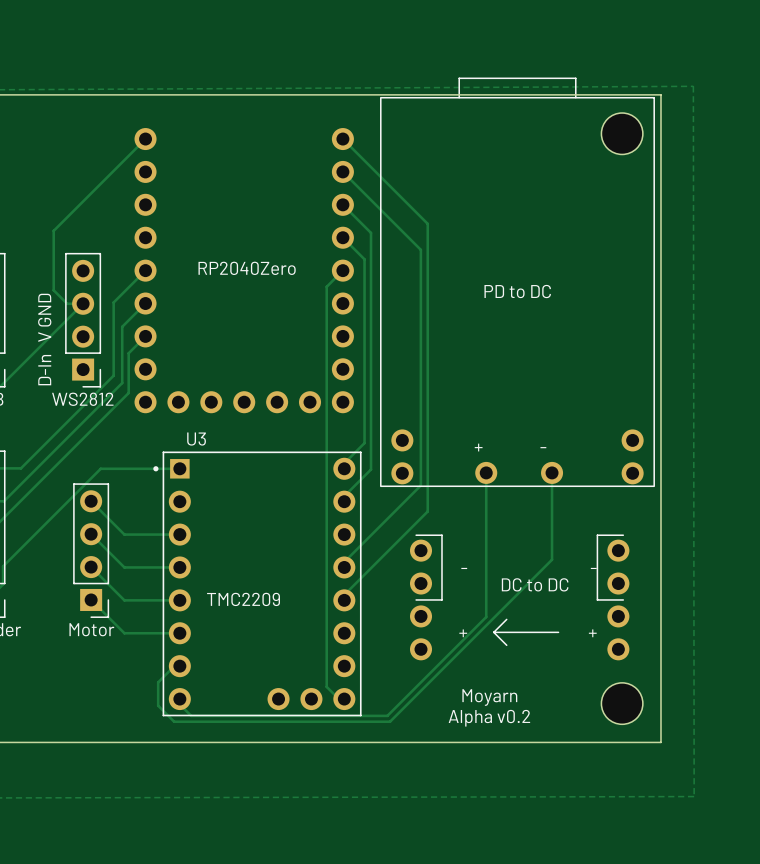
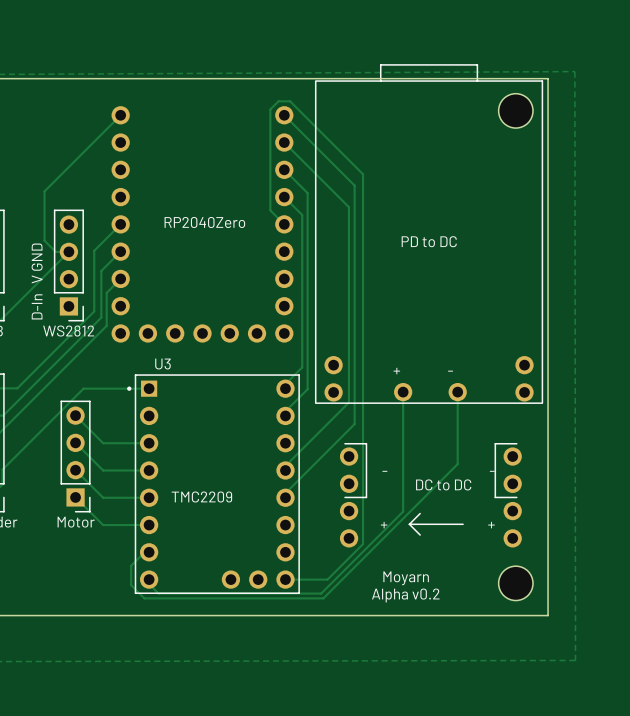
track: (342, 270) (326, 286) (326, 686) (338, 699) -> (284, 224) (270, 210) (270, 109) (278, 101) (290, 101) (363, 174) (363, 544) (327, 579) (280, 579)

